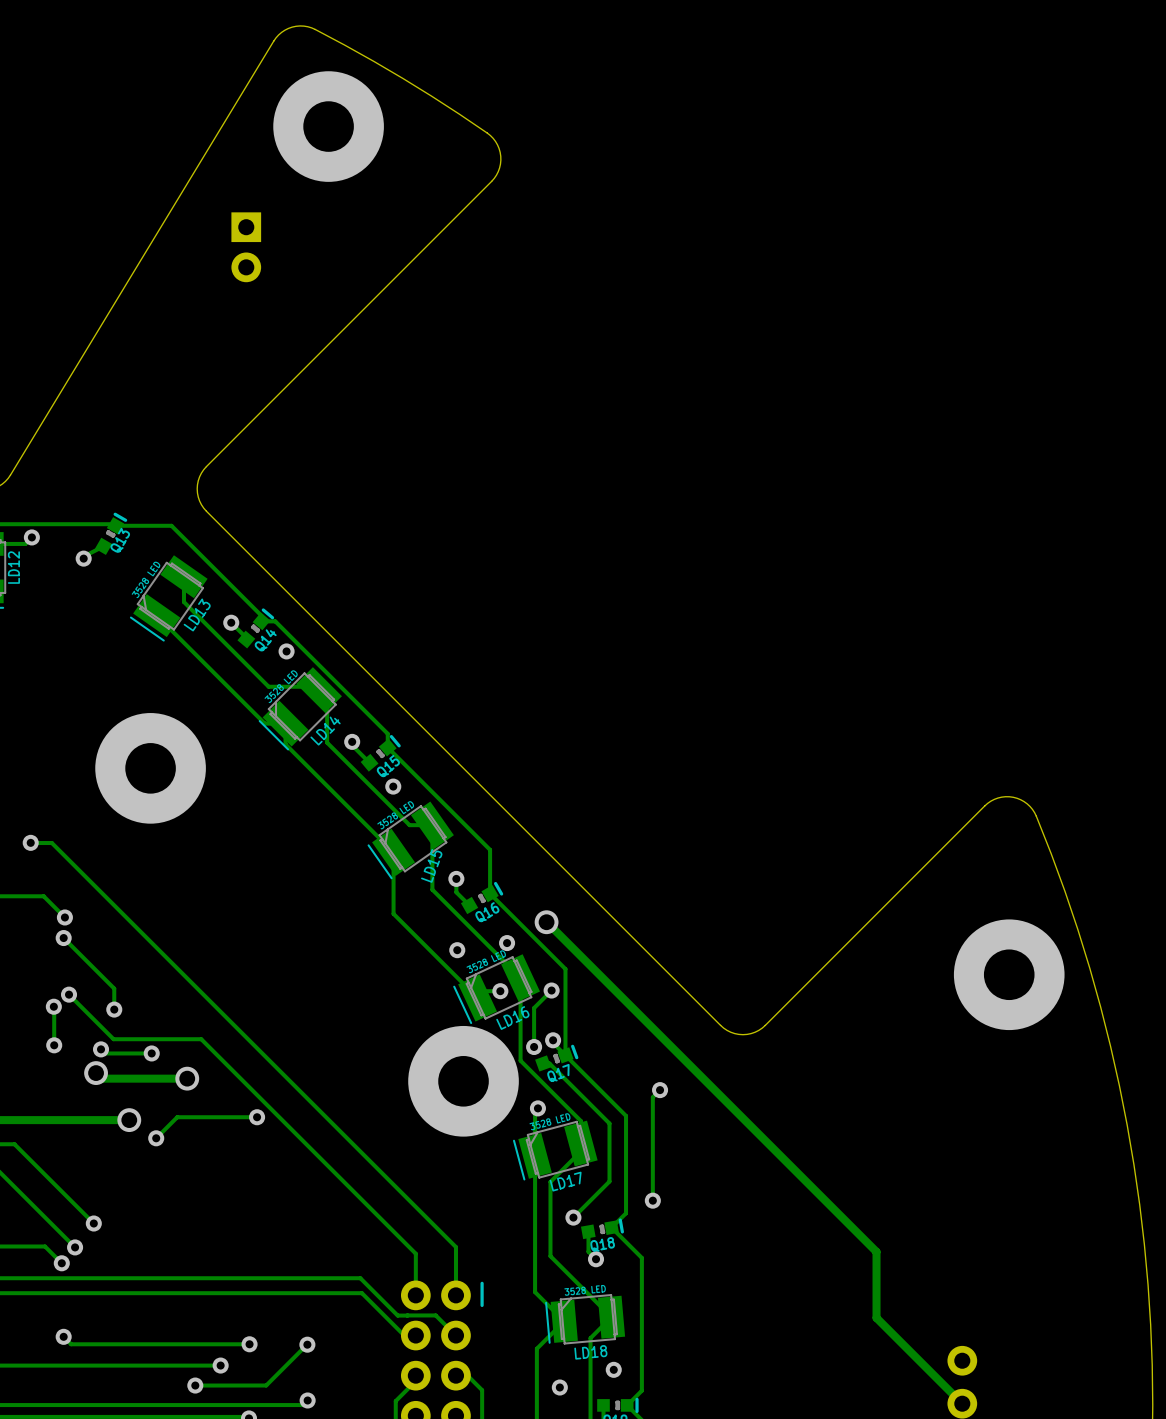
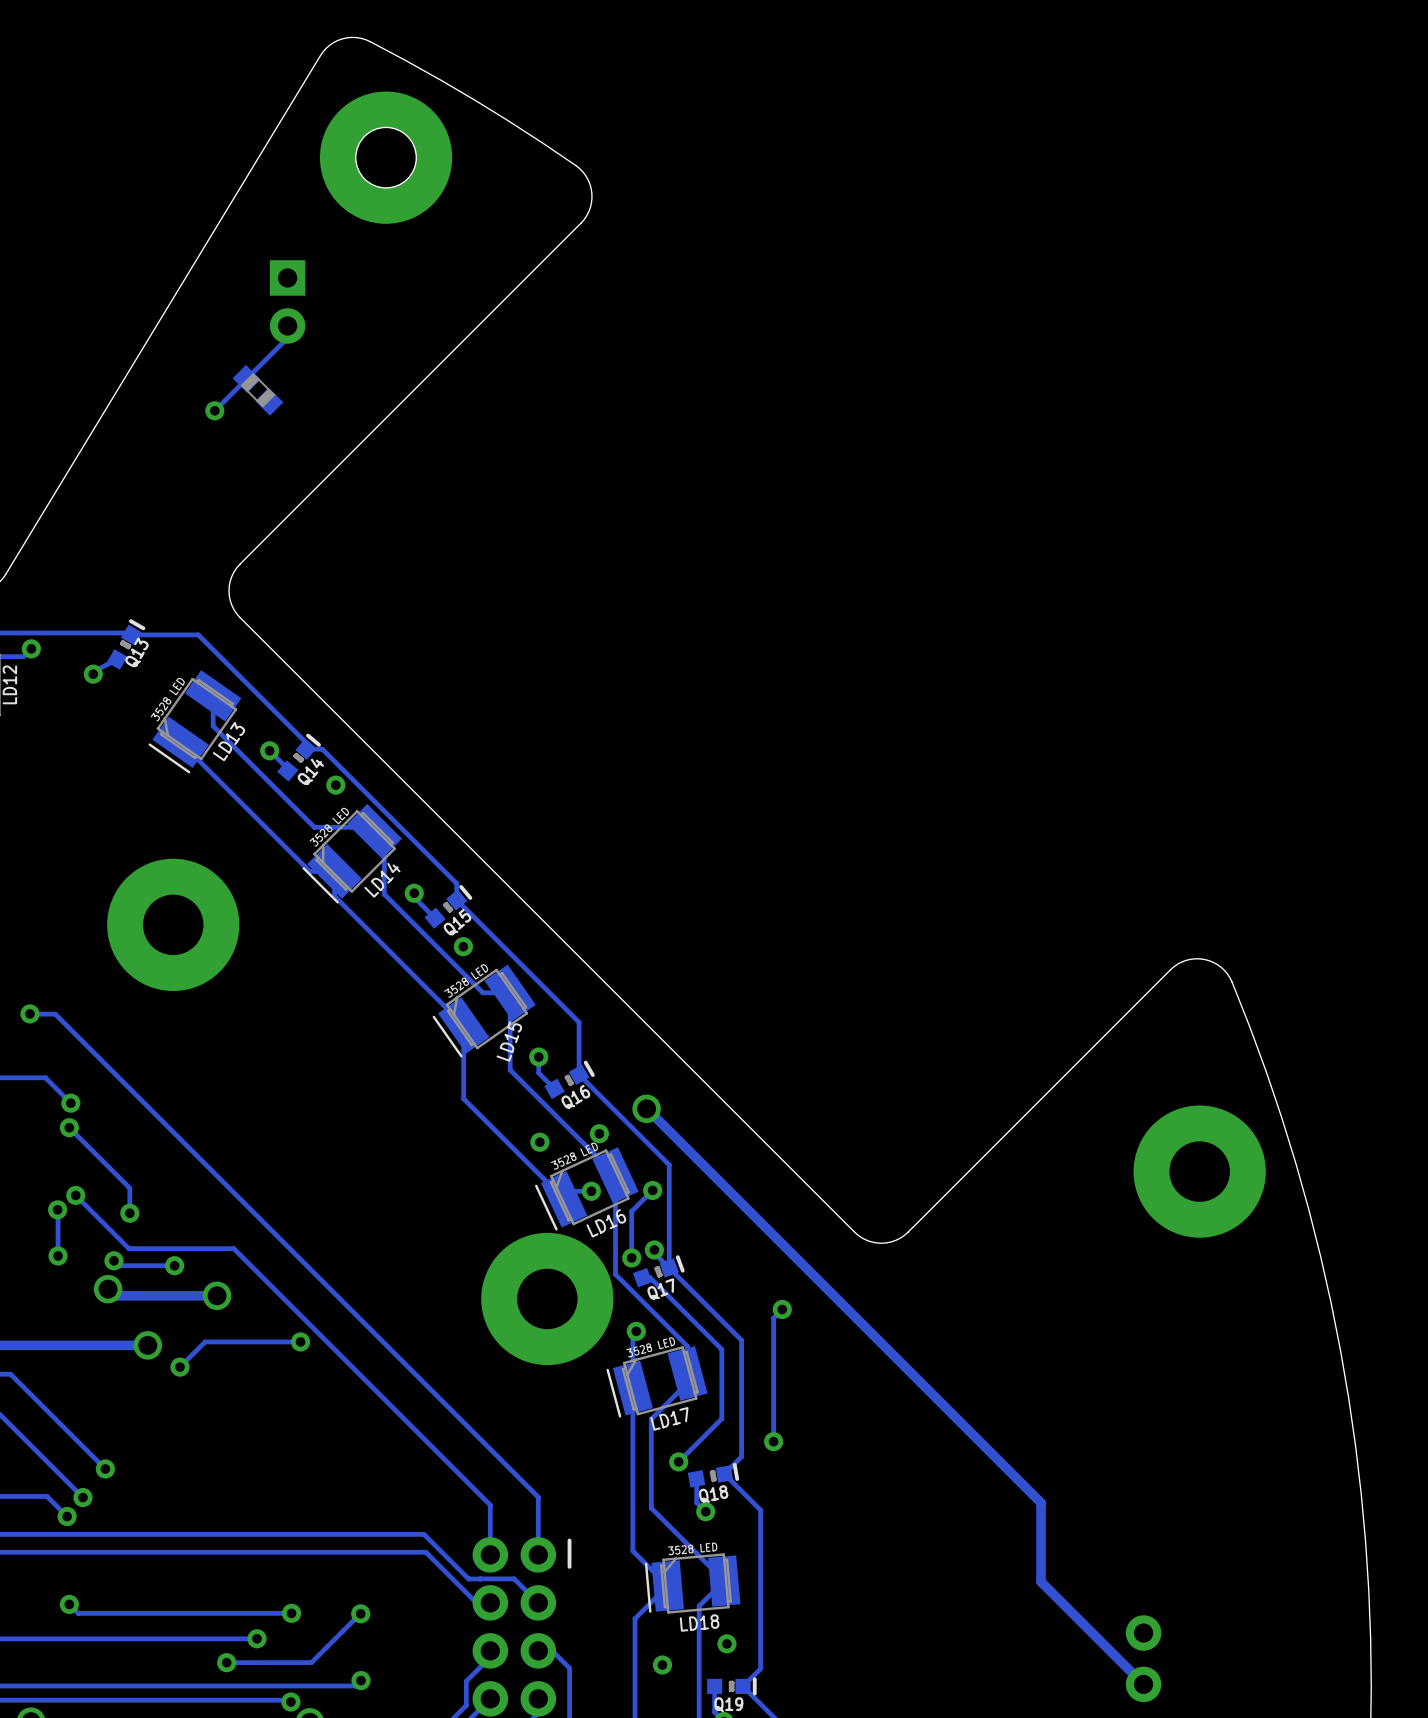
round board edge: none -> [355, 127, 417, 188]
track: none -> (287, 325) (287, 337) (214, 410)
part: none -> (258, 390)
via: none -> (214, 410)

